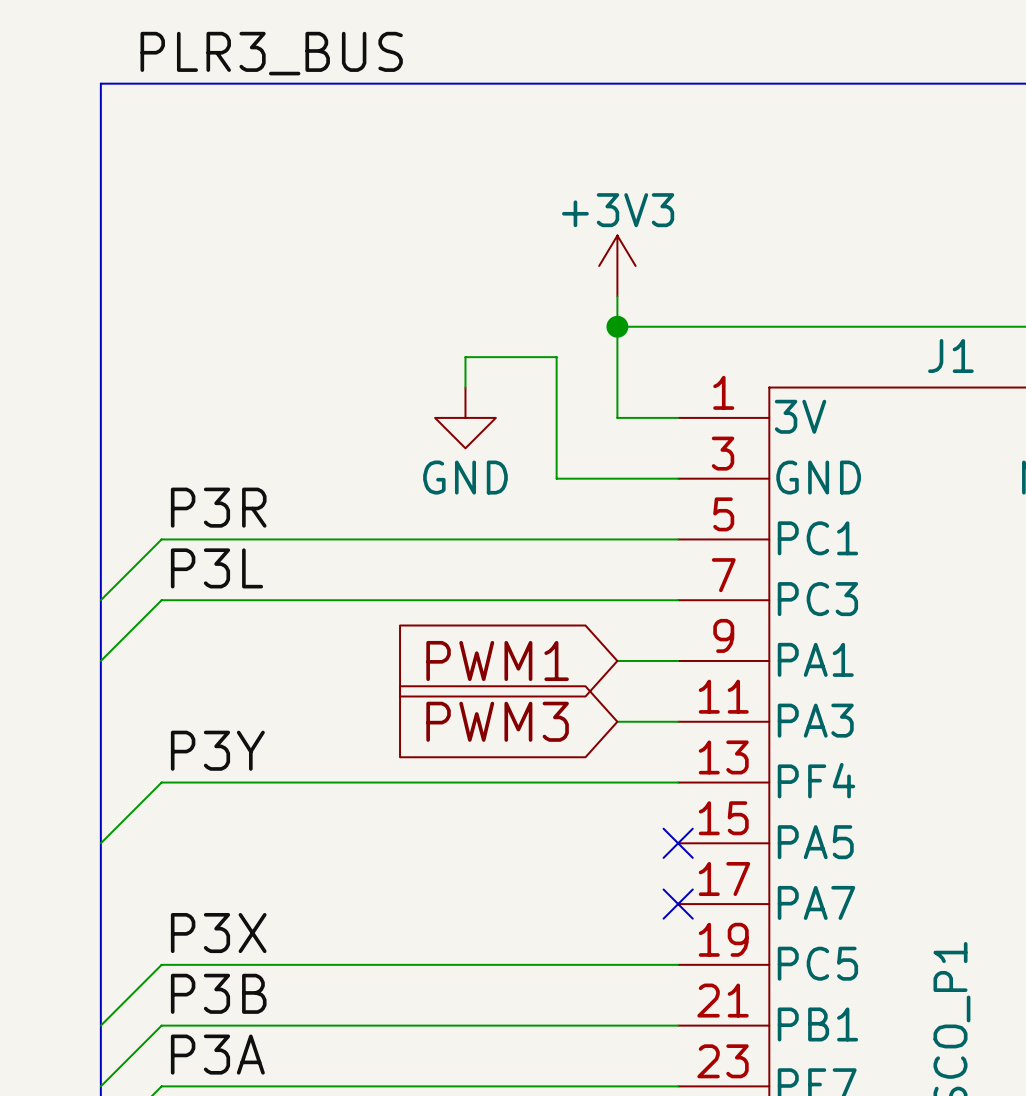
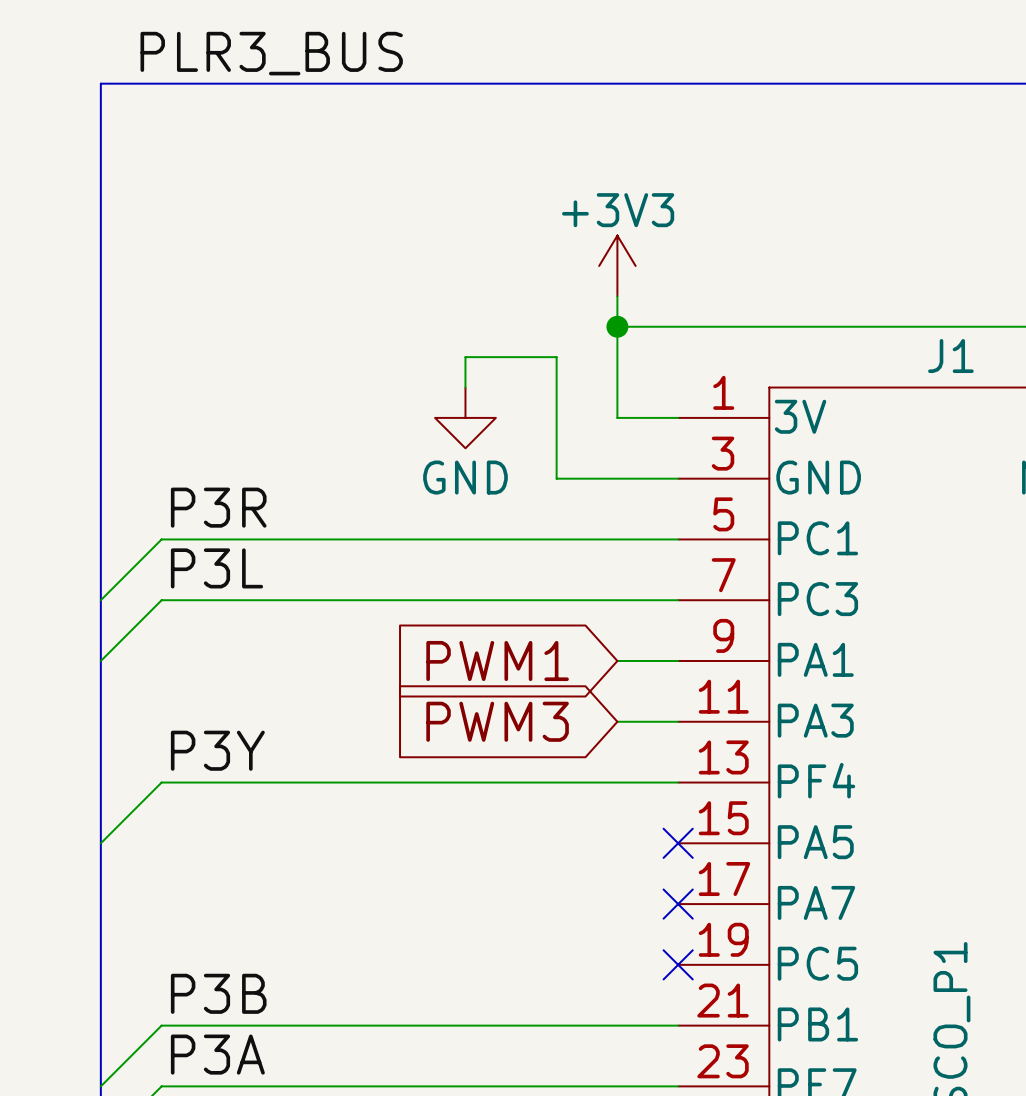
label: P3X (218, 933) -> none
wire: (678, 964) (161, 964) (100, 1025) -> none
no-connect mark: none -> (678, 964)

